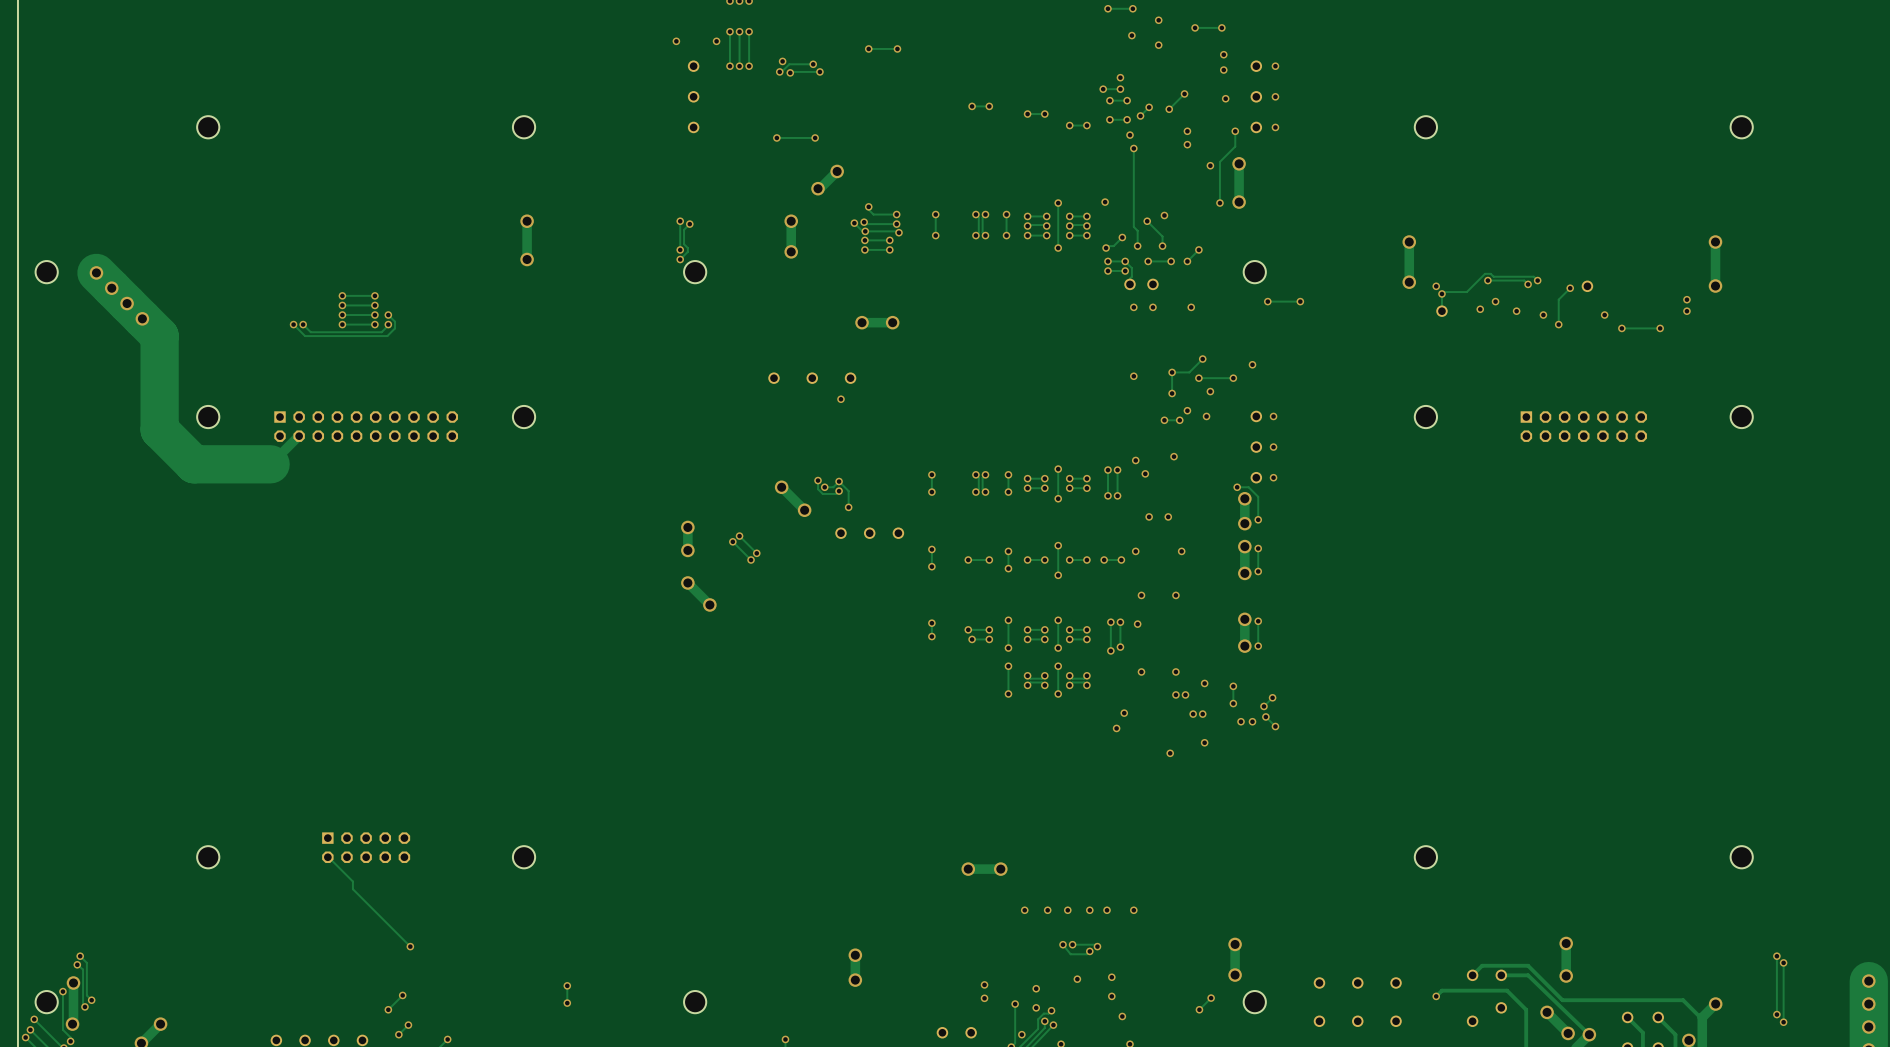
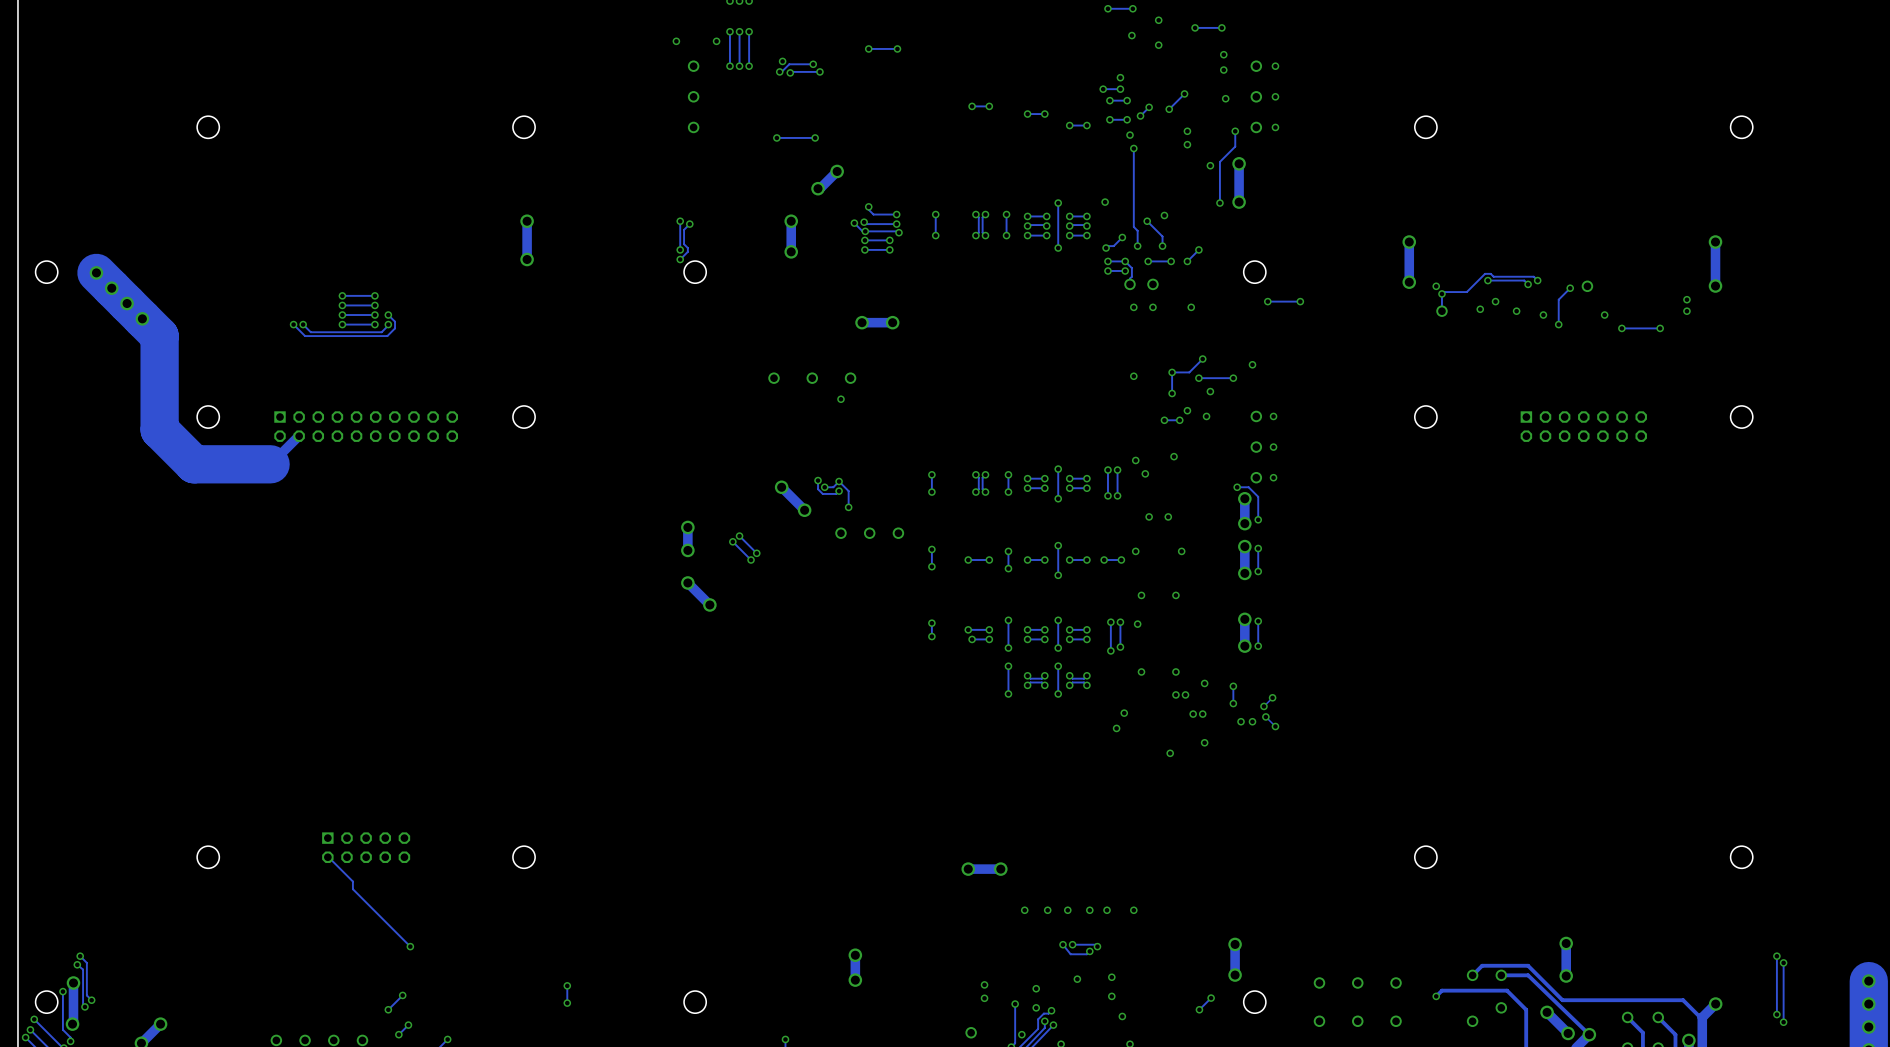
part: (942, 1032) -> none

